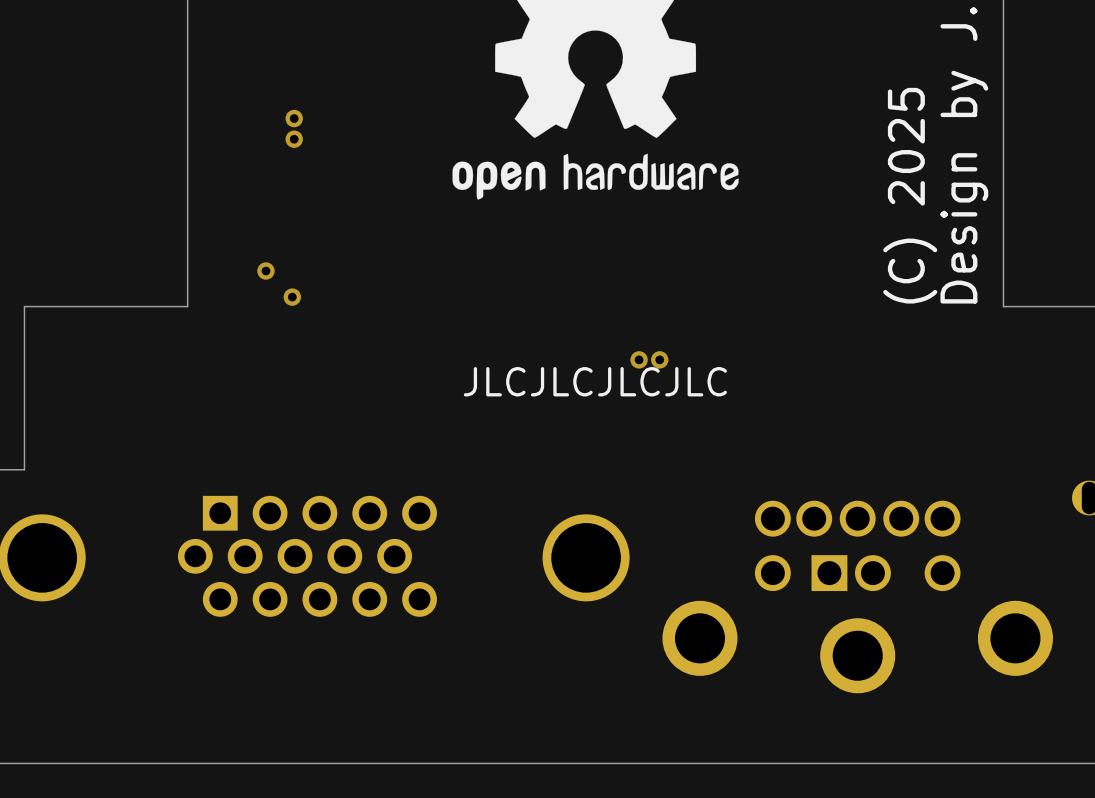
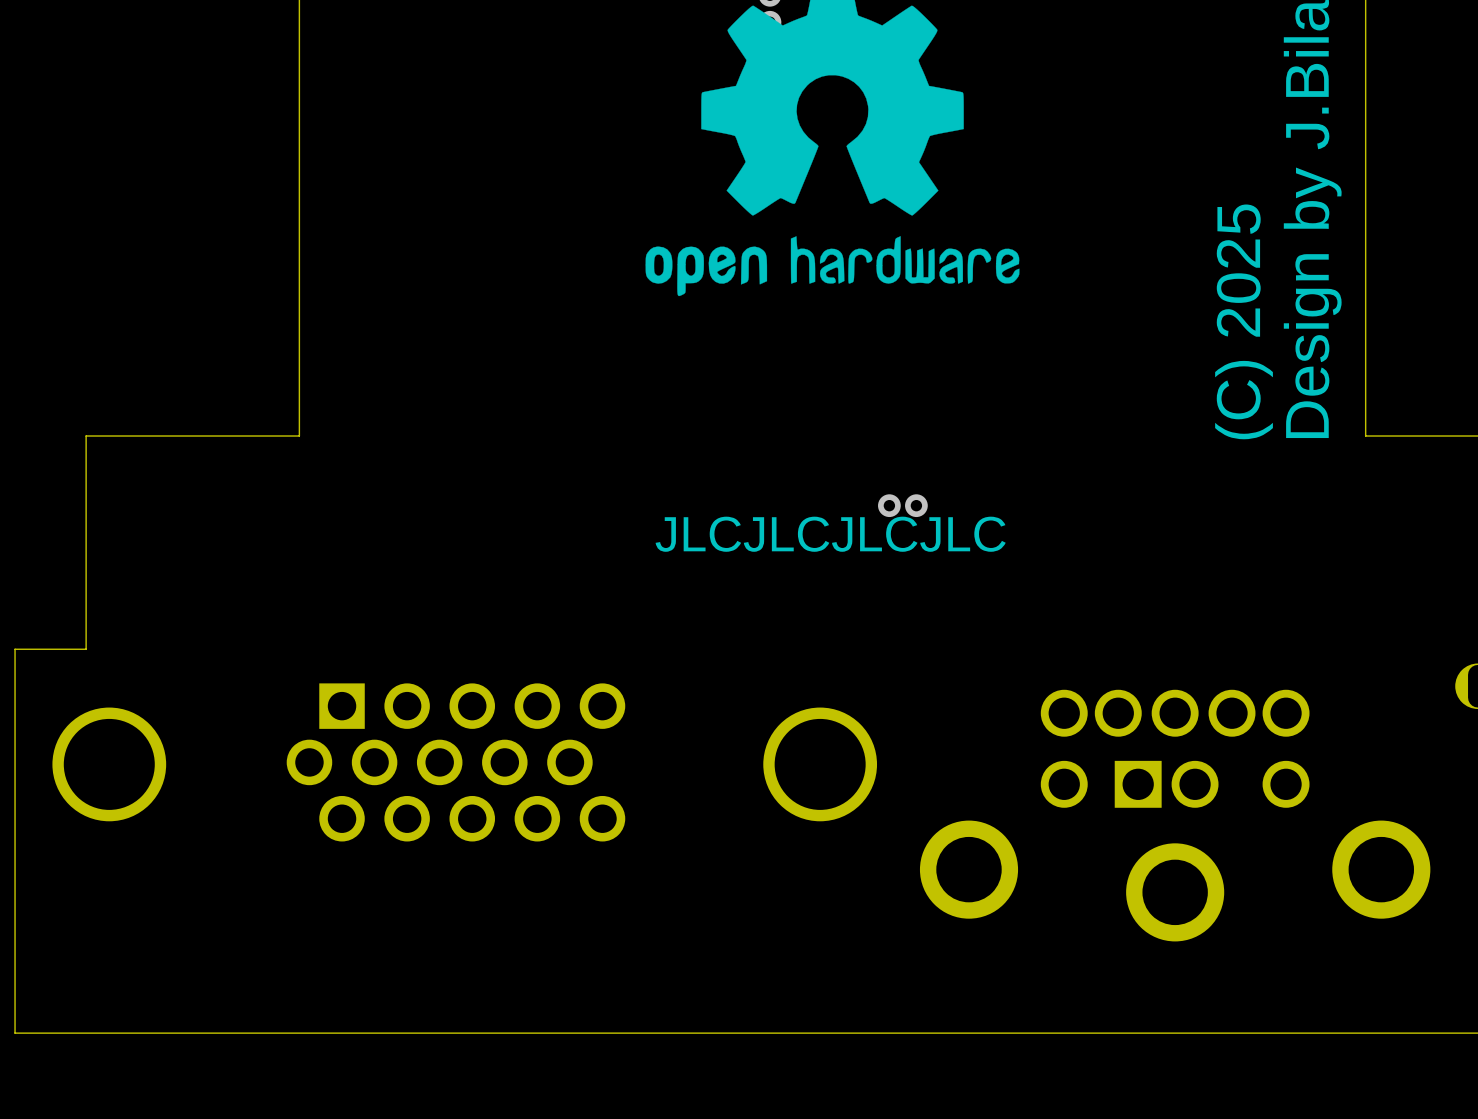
via: (294, 118) -> none
via: (294, 139) -> none
via: (265, 271) -> none
via: (292, 297) -> none

